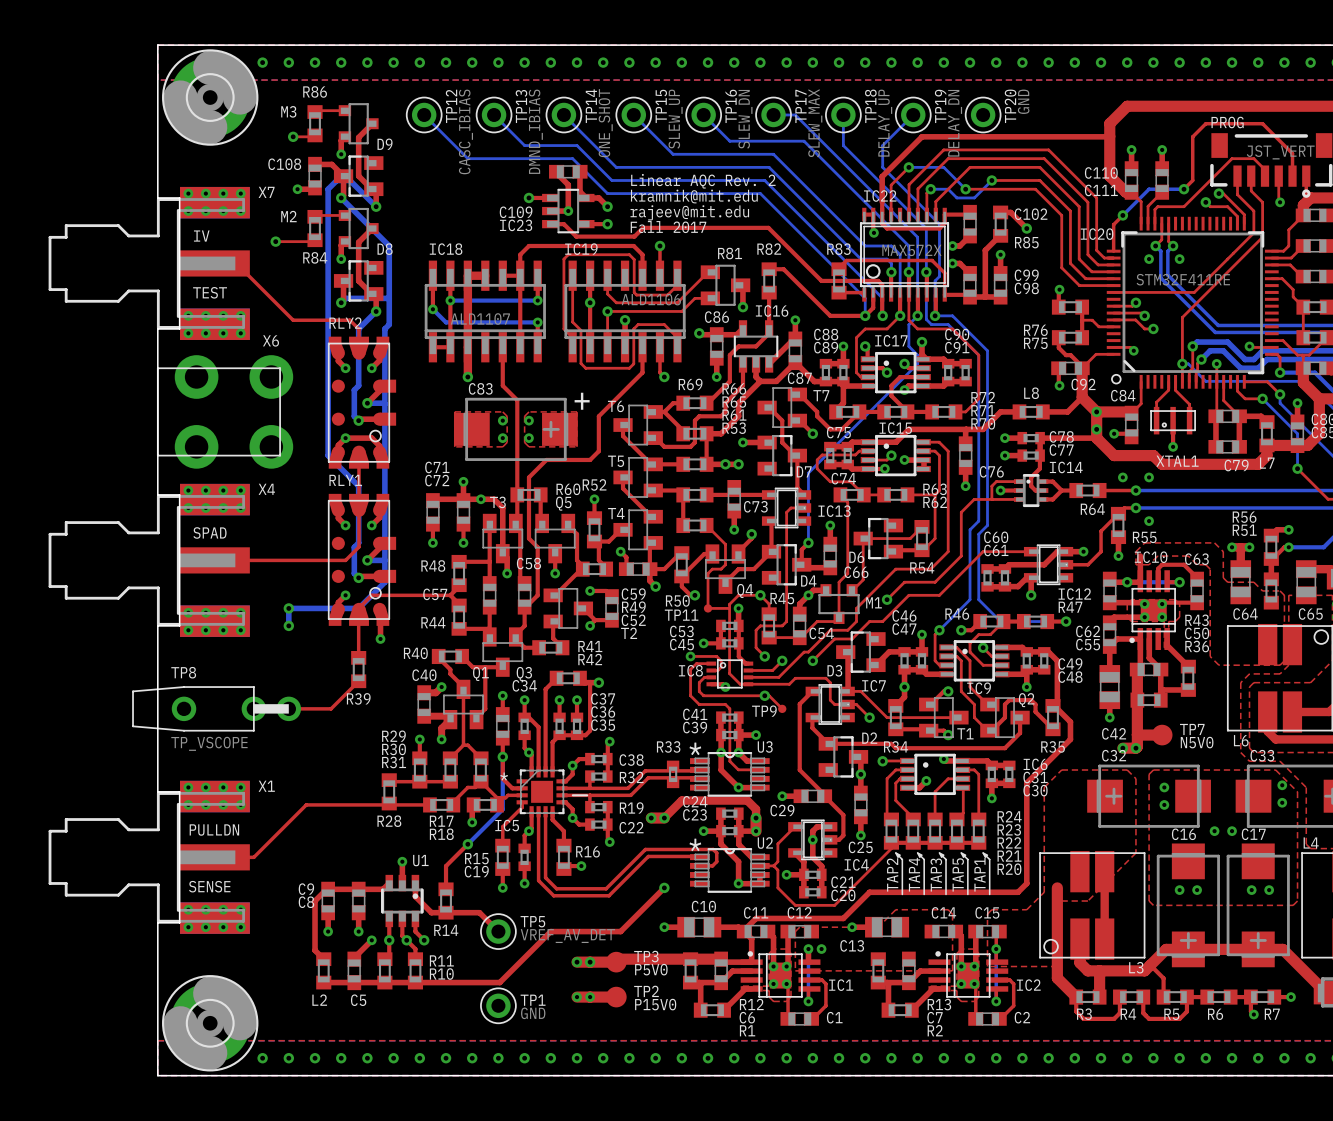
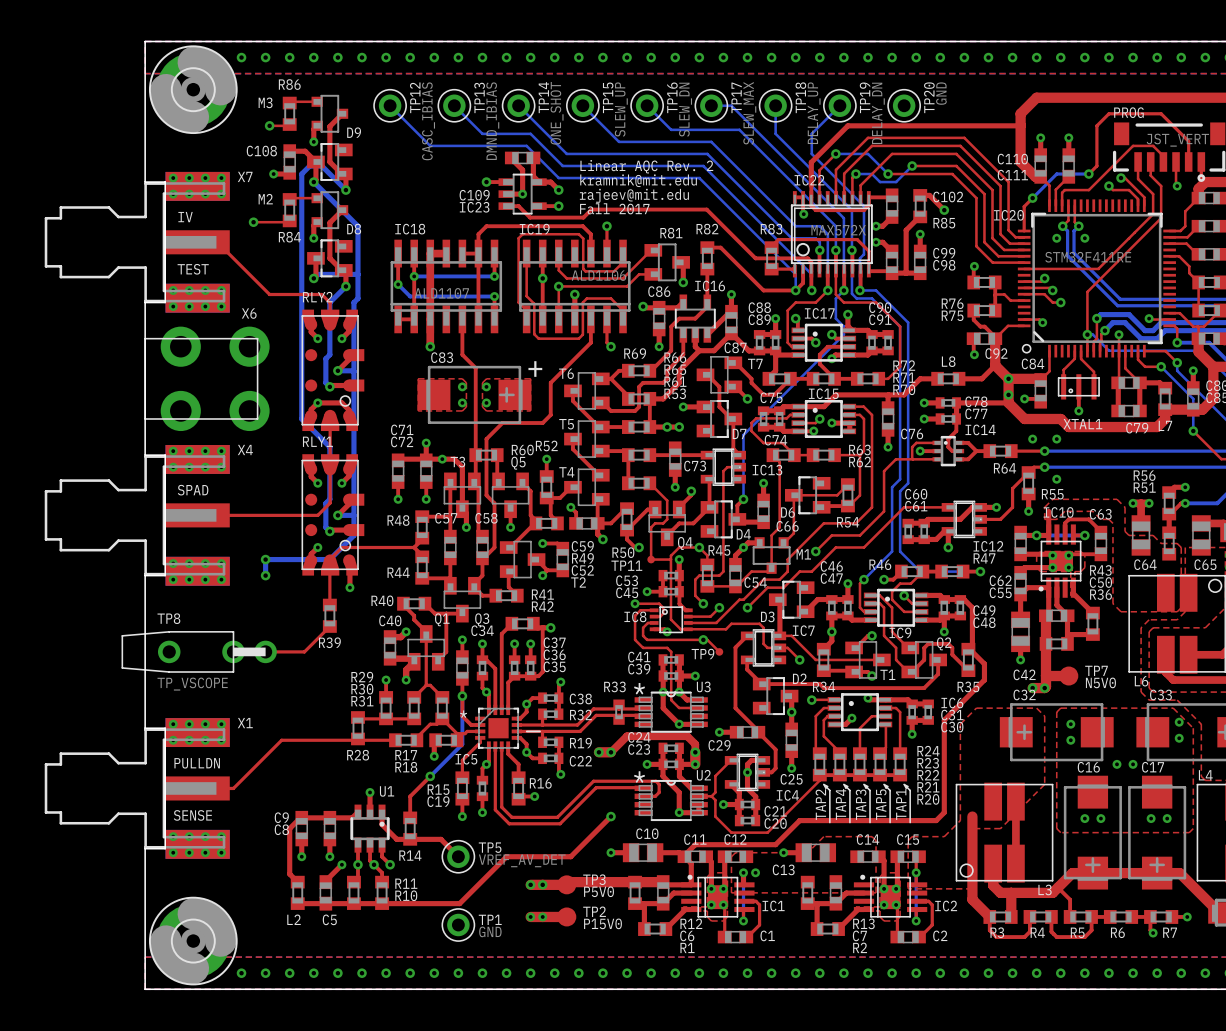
C57 name position: C57 (435, 594) -> C57 (446, 518)

